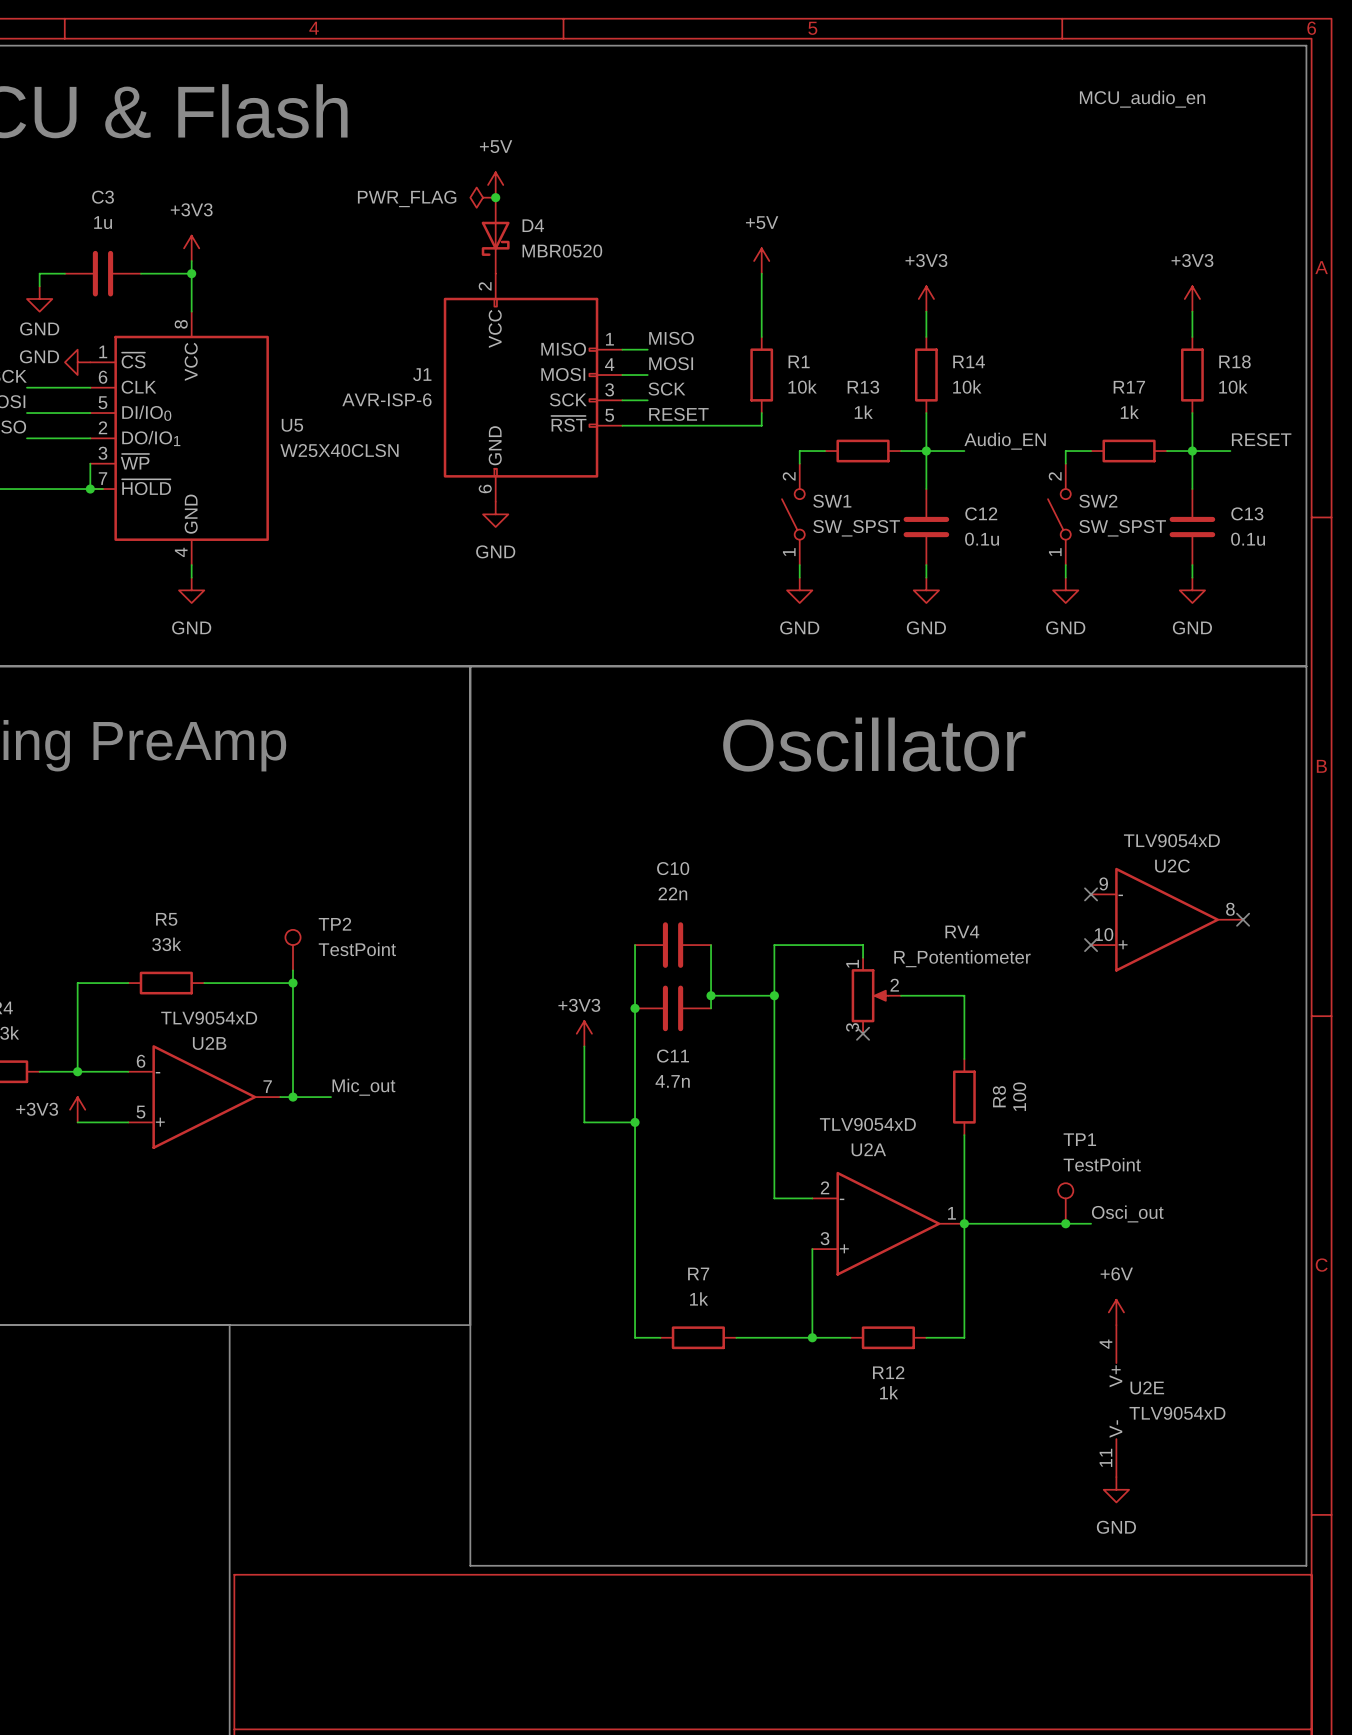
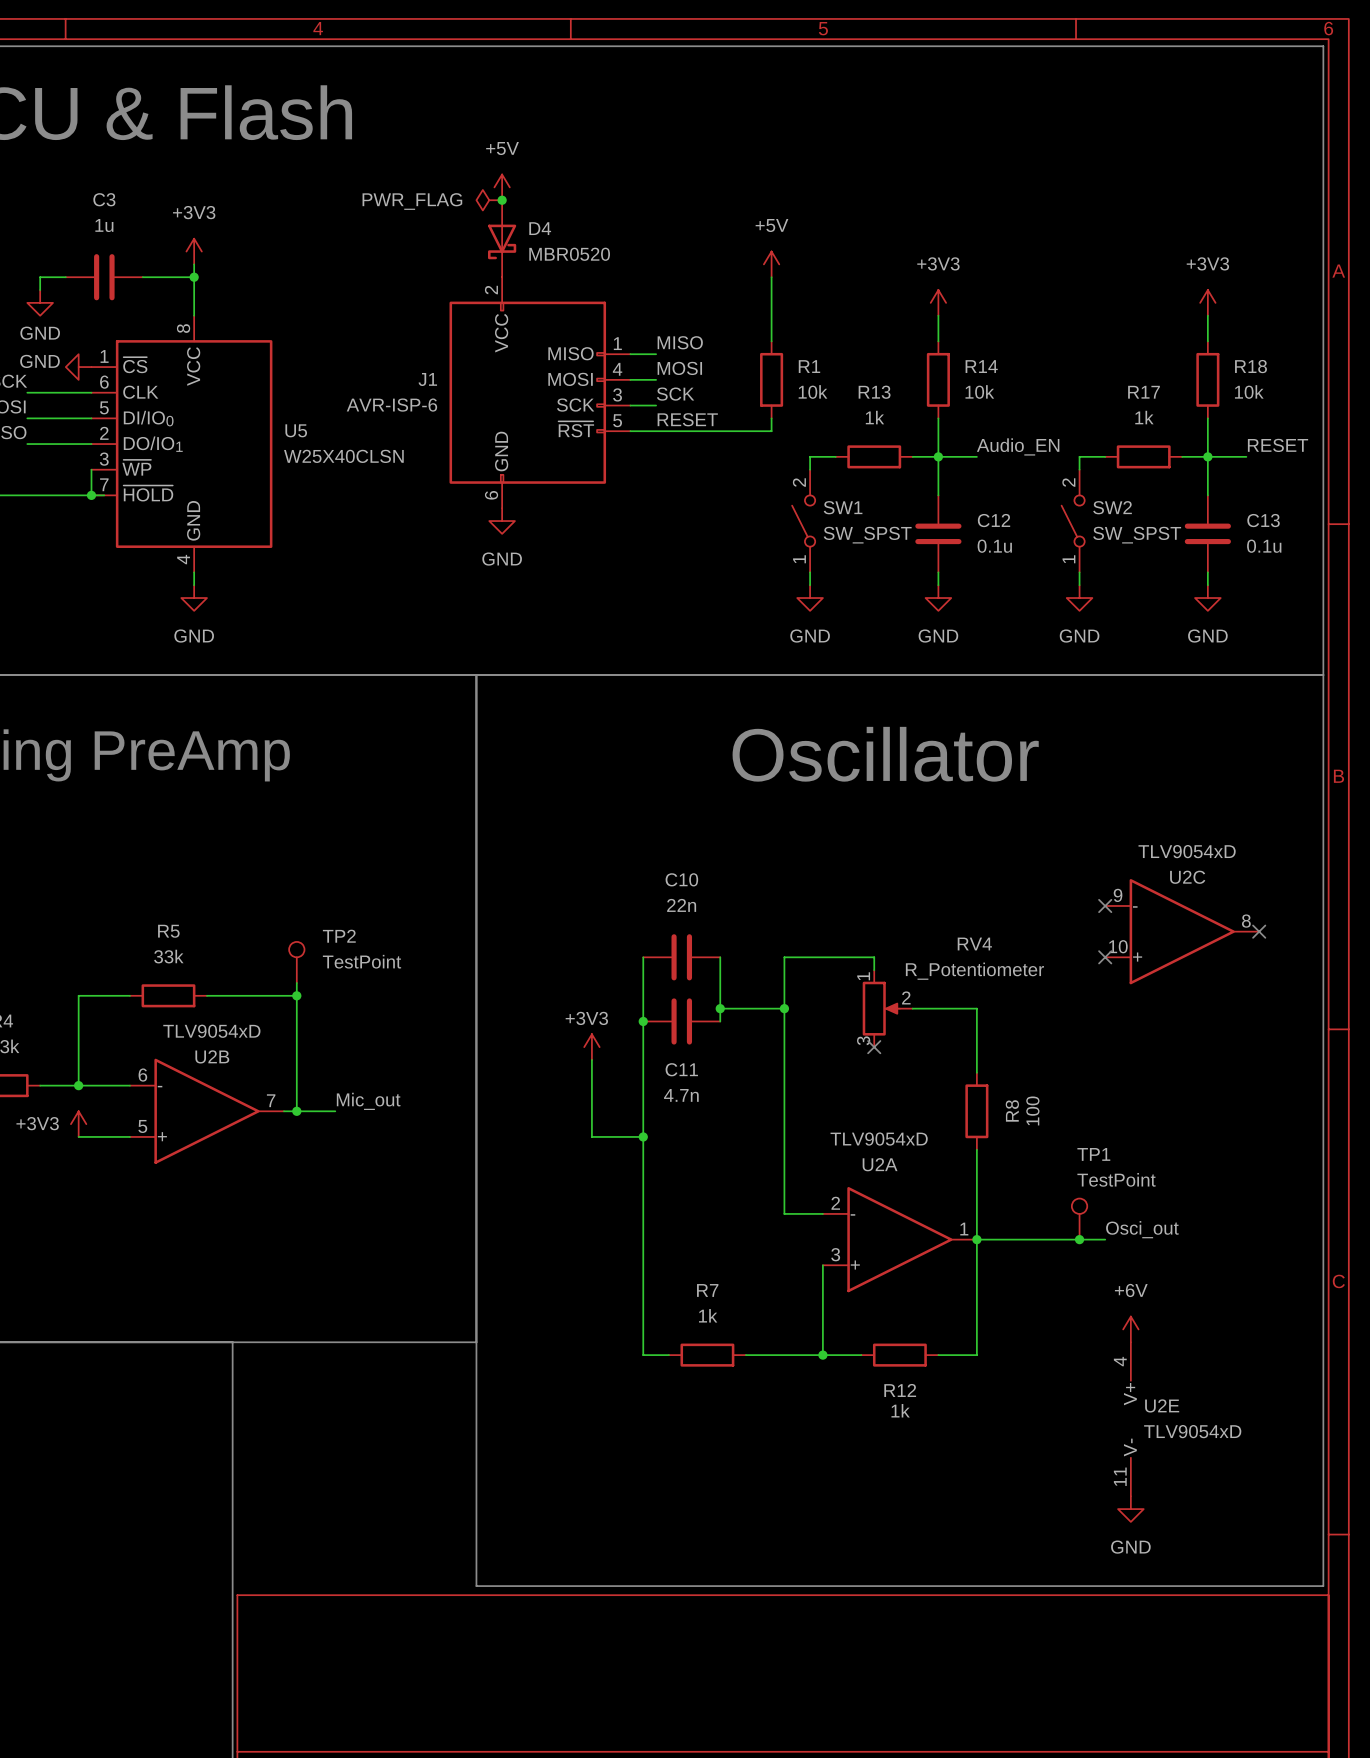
label: MCU_audio_en (1142, 99) -> none

